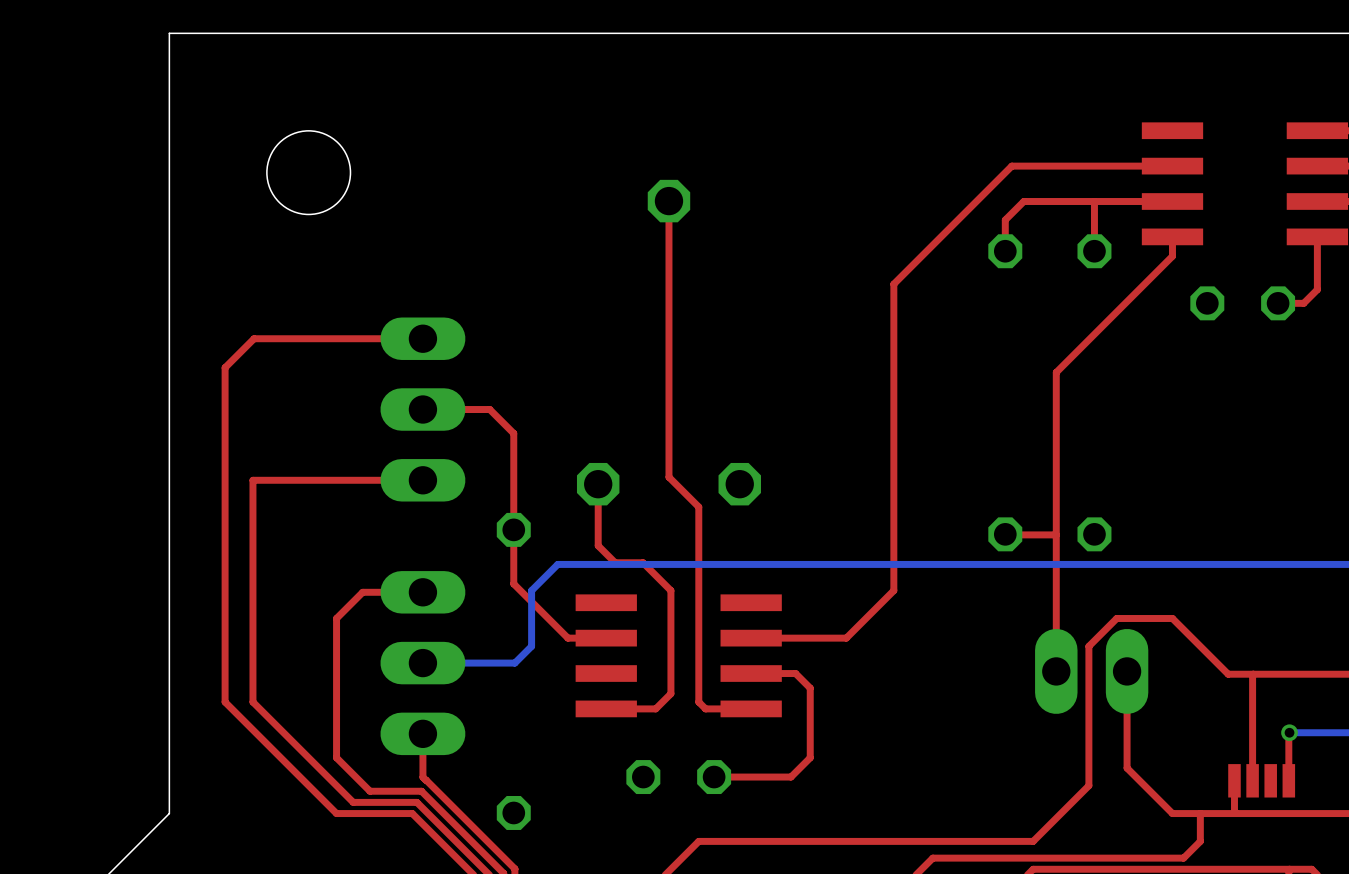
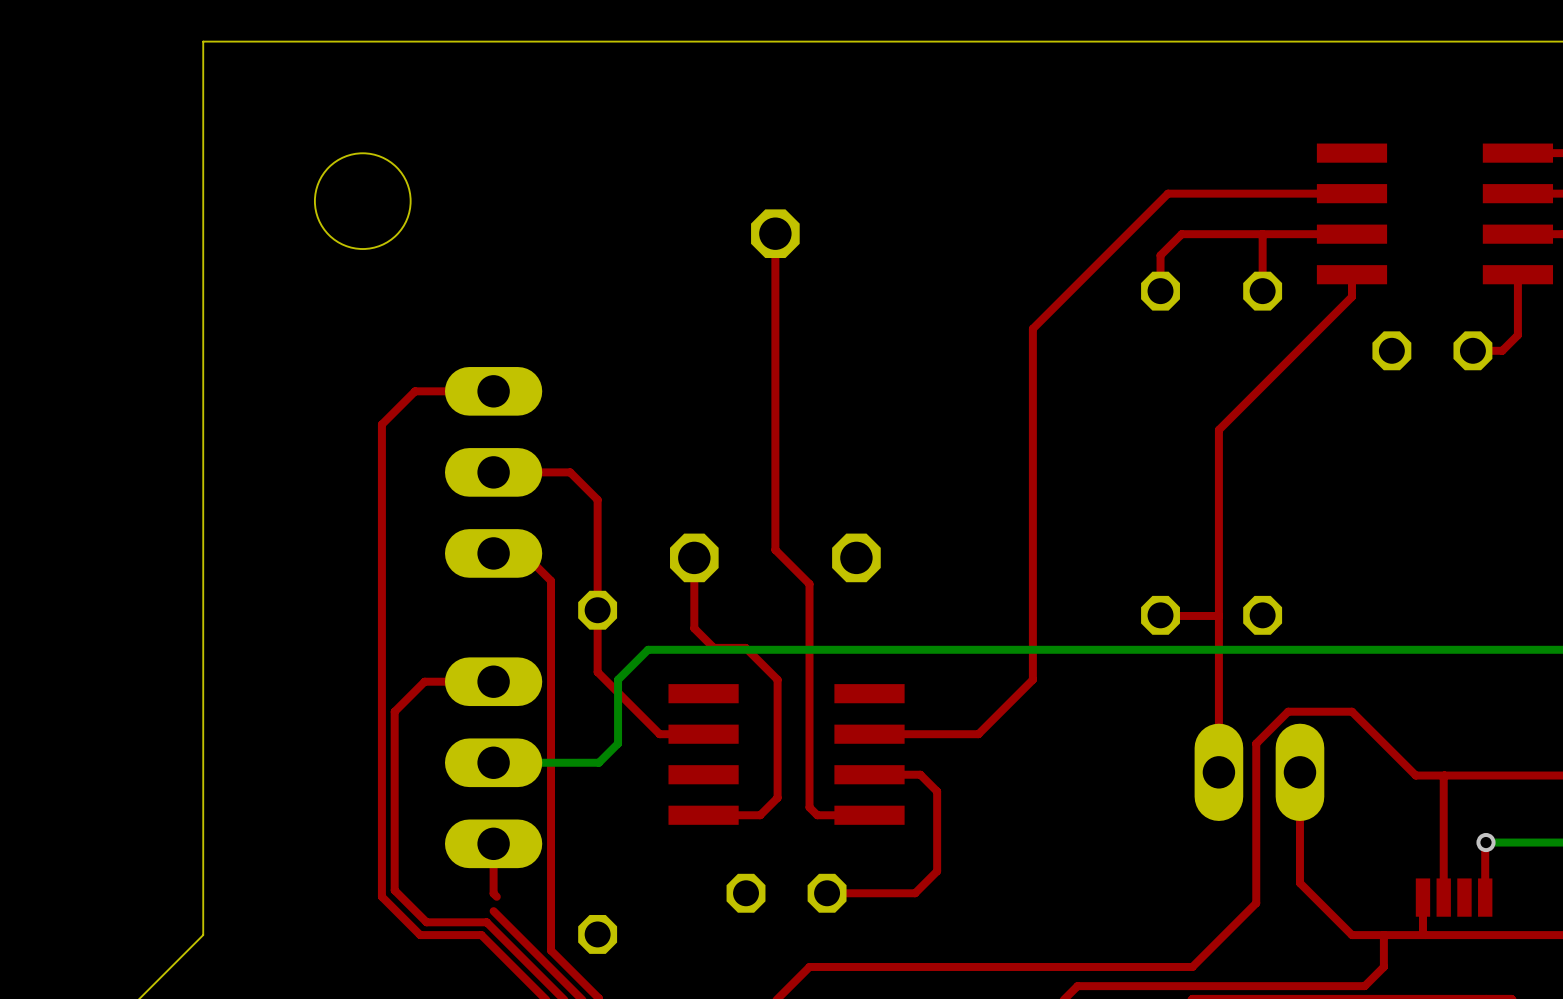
top track: (354, 338) (254, 338) (225, 367) (225, 702) (336, 813) (358, 813) -> (415, 391) (381, 424) (381, 896) (420, 935)
top track: (422, 480) (252, 480) (252, 702) (353, 802) (364, 802) -> (493, 553) (522, 552) (551, 580) (551, 950)
top track: (336, 757) (369, 791) (422, 792) -> (394, 871) (394, 890) (426, 922)
top track: (426, 780) (473, 827) -> none

